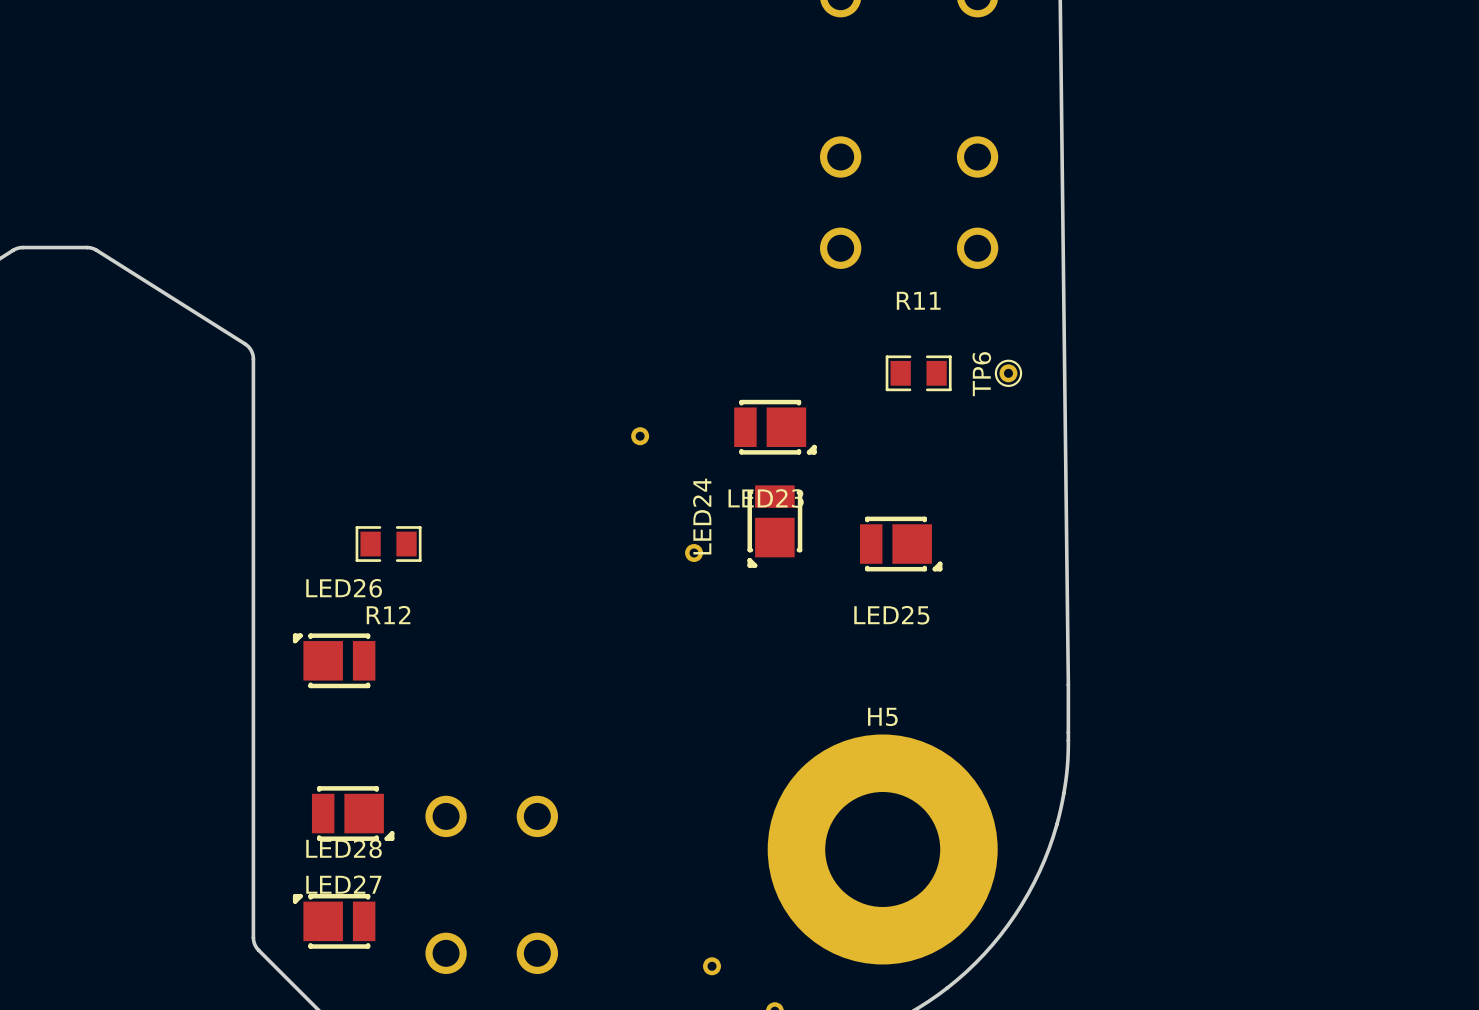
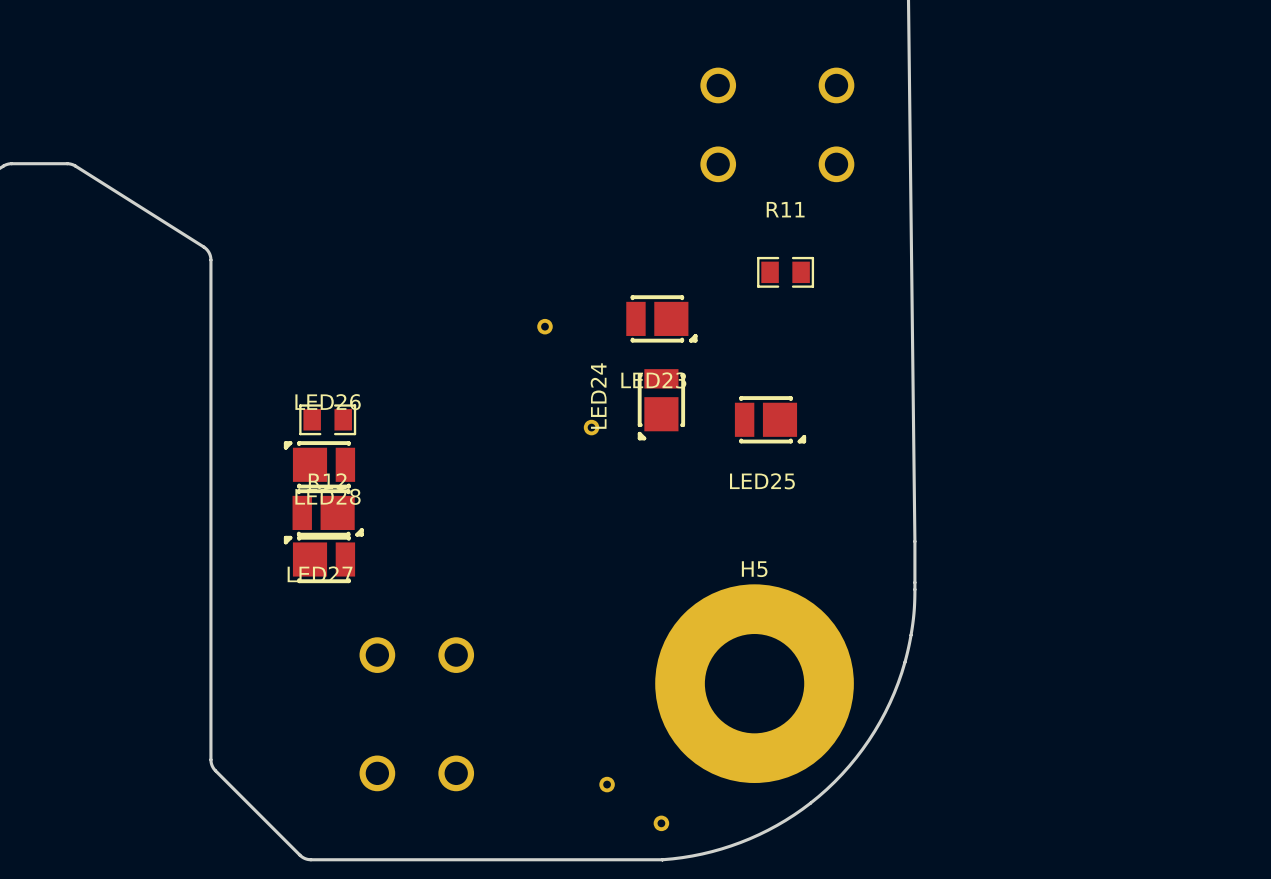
TP6: (1008, 373) -> none
LED26 position: (334, 660) -> (319, 464)
LED27 position: (353, 813) -> (328, 512)
LED28 position: (334, 921) -> (319, 559)

